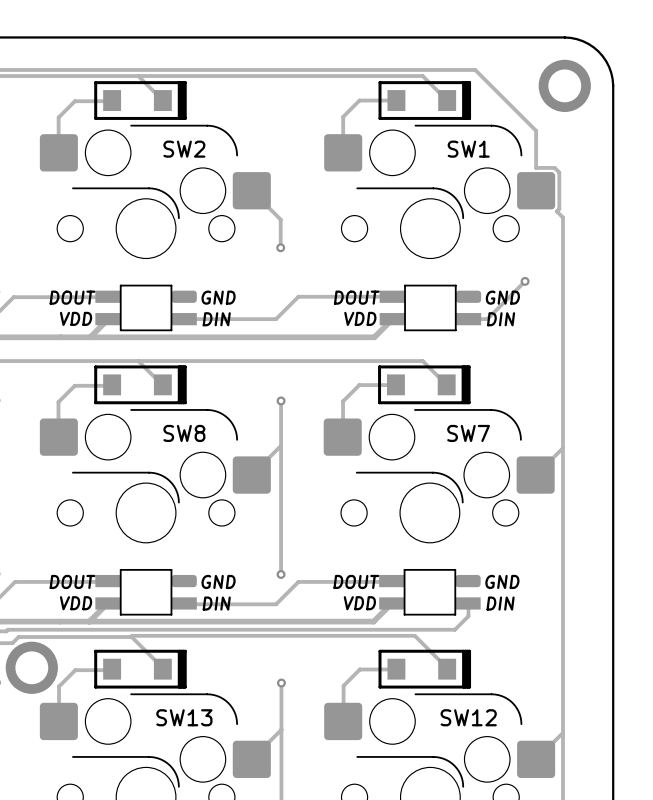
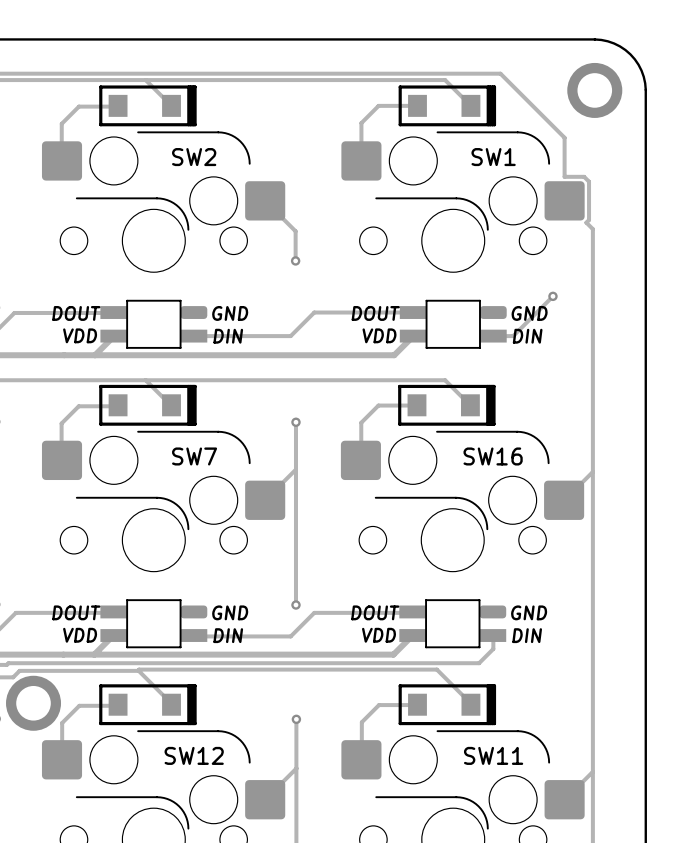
SW8 name: SW8 (184, 433) -> SW7 (194, 456)
SW7 name: SW7 (468, 433) -> SW16 (493, 456)
SW13 name: SW13 (184, 717) -> SW12 (194, 755)
SW12 name: SW12 (468, 717) -> SW11 (493, 755)

